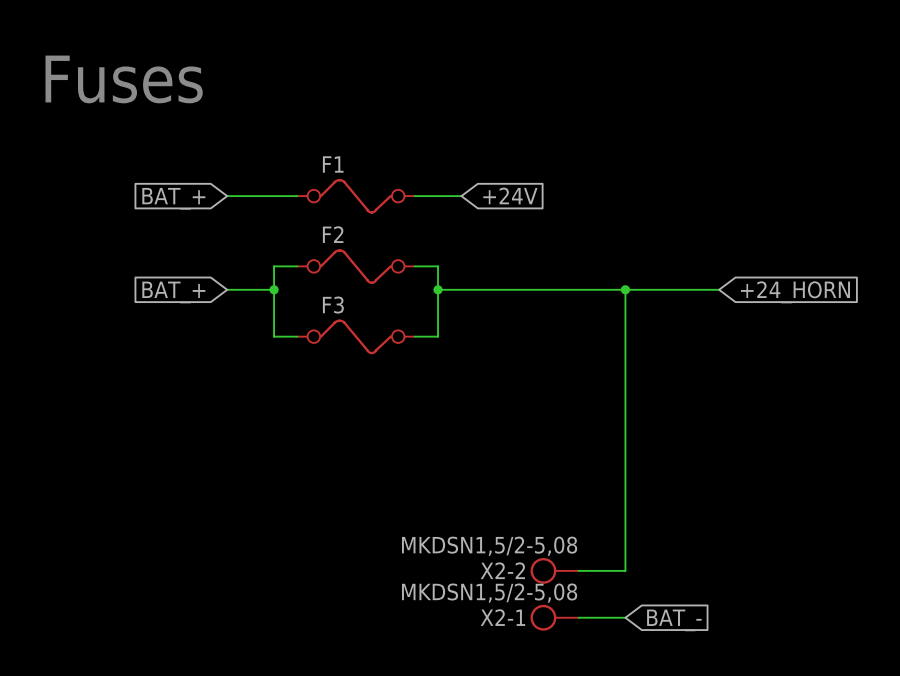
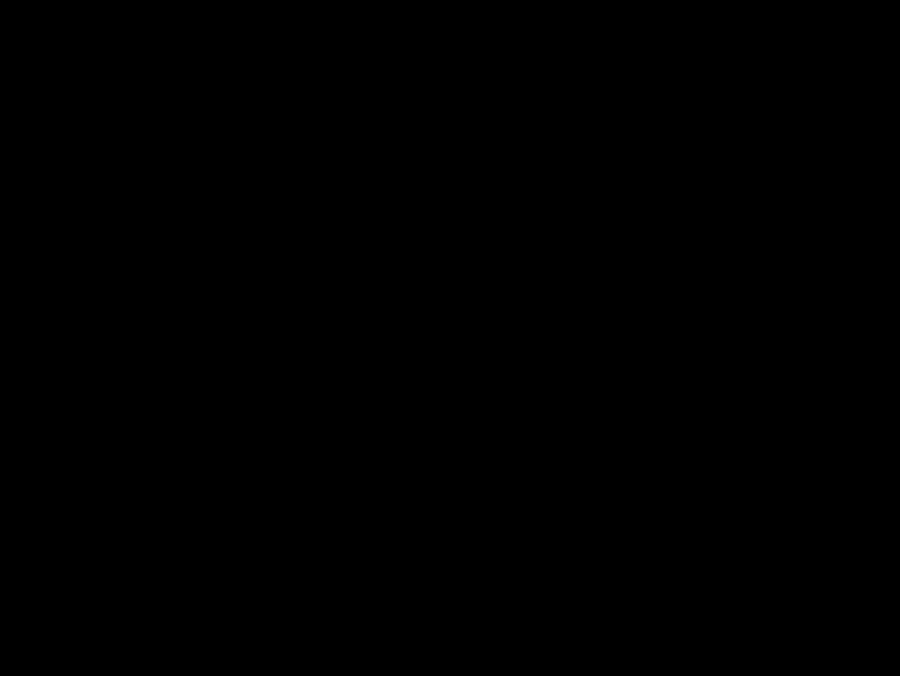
text: Fuses (124, 79) -> none
global label: +24V (510, 195) -> none
wire: (227, 196) (297, 196) -> none
F1: (356, 196) -> none
wire: (414, 196) (461, 196) -> none
global label: BAT_+ (173, 198) -> none
wire: (297, 266) (274, 266) (274, 336) (297, 336) -> none
F2: (356, 266) -> none
wire: (414, 266) (438, 266) (438, 336) (414, 336) -> none
wire: (227, 289) (274, 289) -> none
junction: (274, 289) -> none
wire: (438, 289) (719, 289) -> none
junction: (438, 289) -> none
wire: (625, 289) (625, 570) (578, 570) -> none
junction: (625, 289) -> none
global label: BAT_+ (173, 292) -> none
global label: +24_HORN (795, 292) -> none
F3: (356, 336) -> none
X2-2: MKDSN1,5/2-5,08 (554, 570) -> none
X2-1: MKDSN1,5/2-5,08 (554, 617) -> none
wire: (578, 617) (625, 617) -> none
global label: BAT_- (674, 620) -> none

